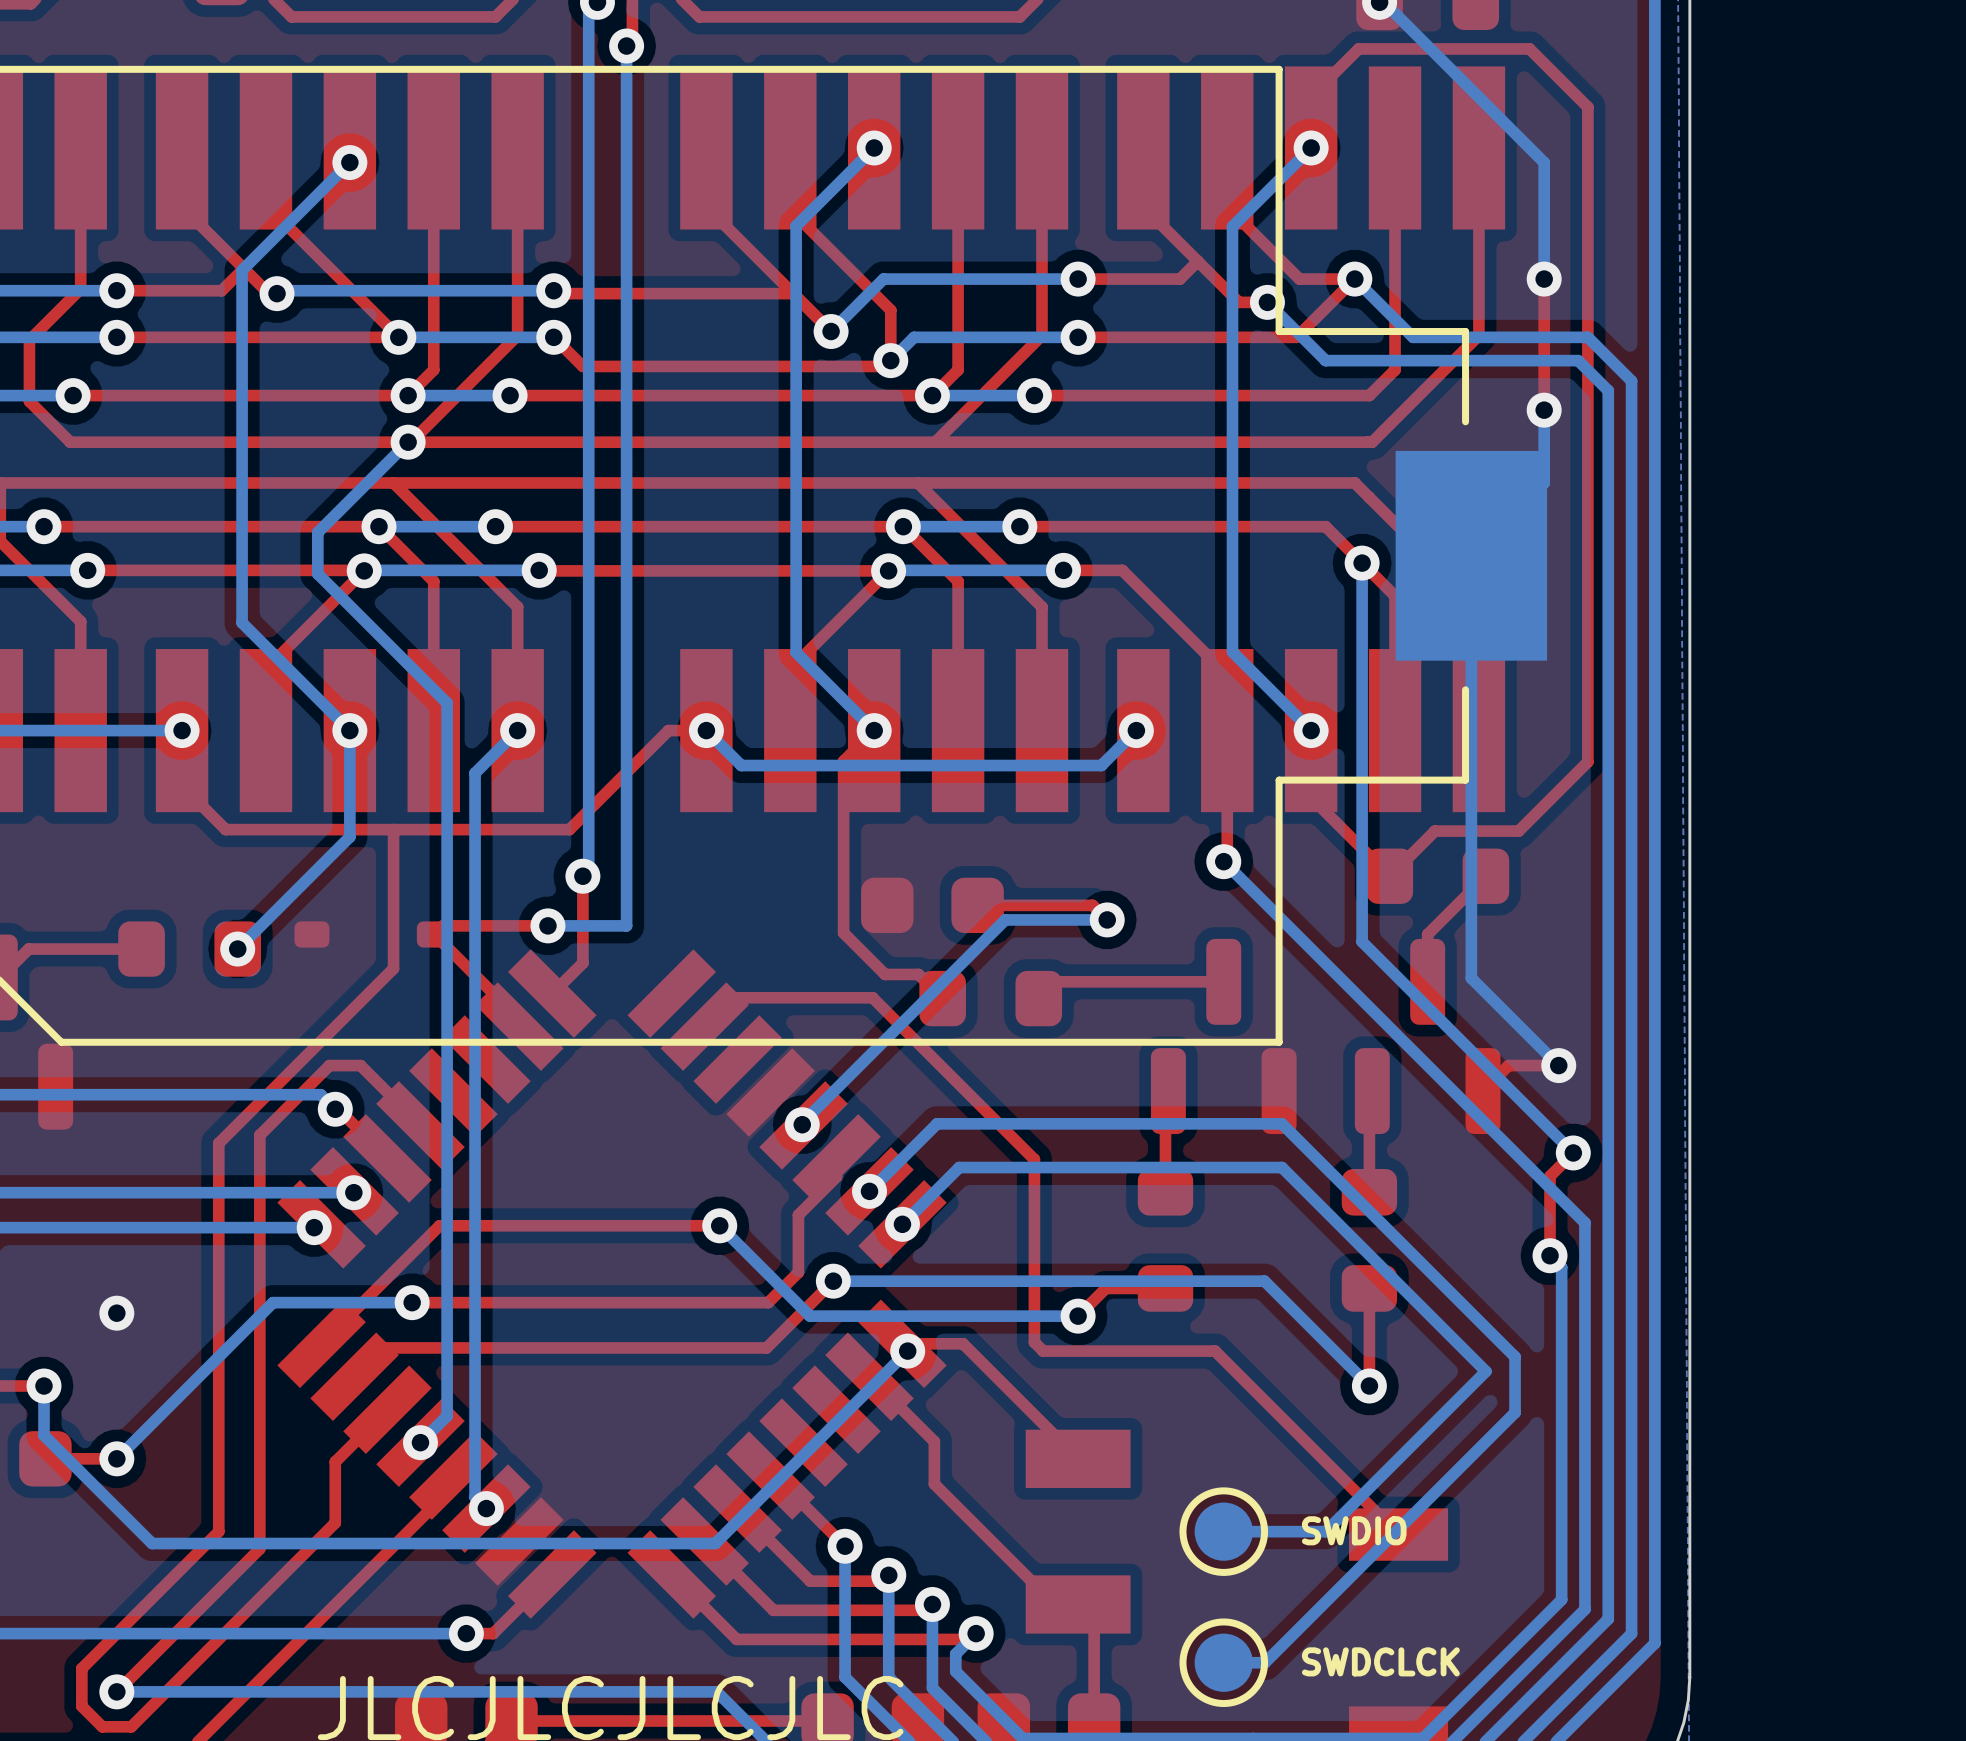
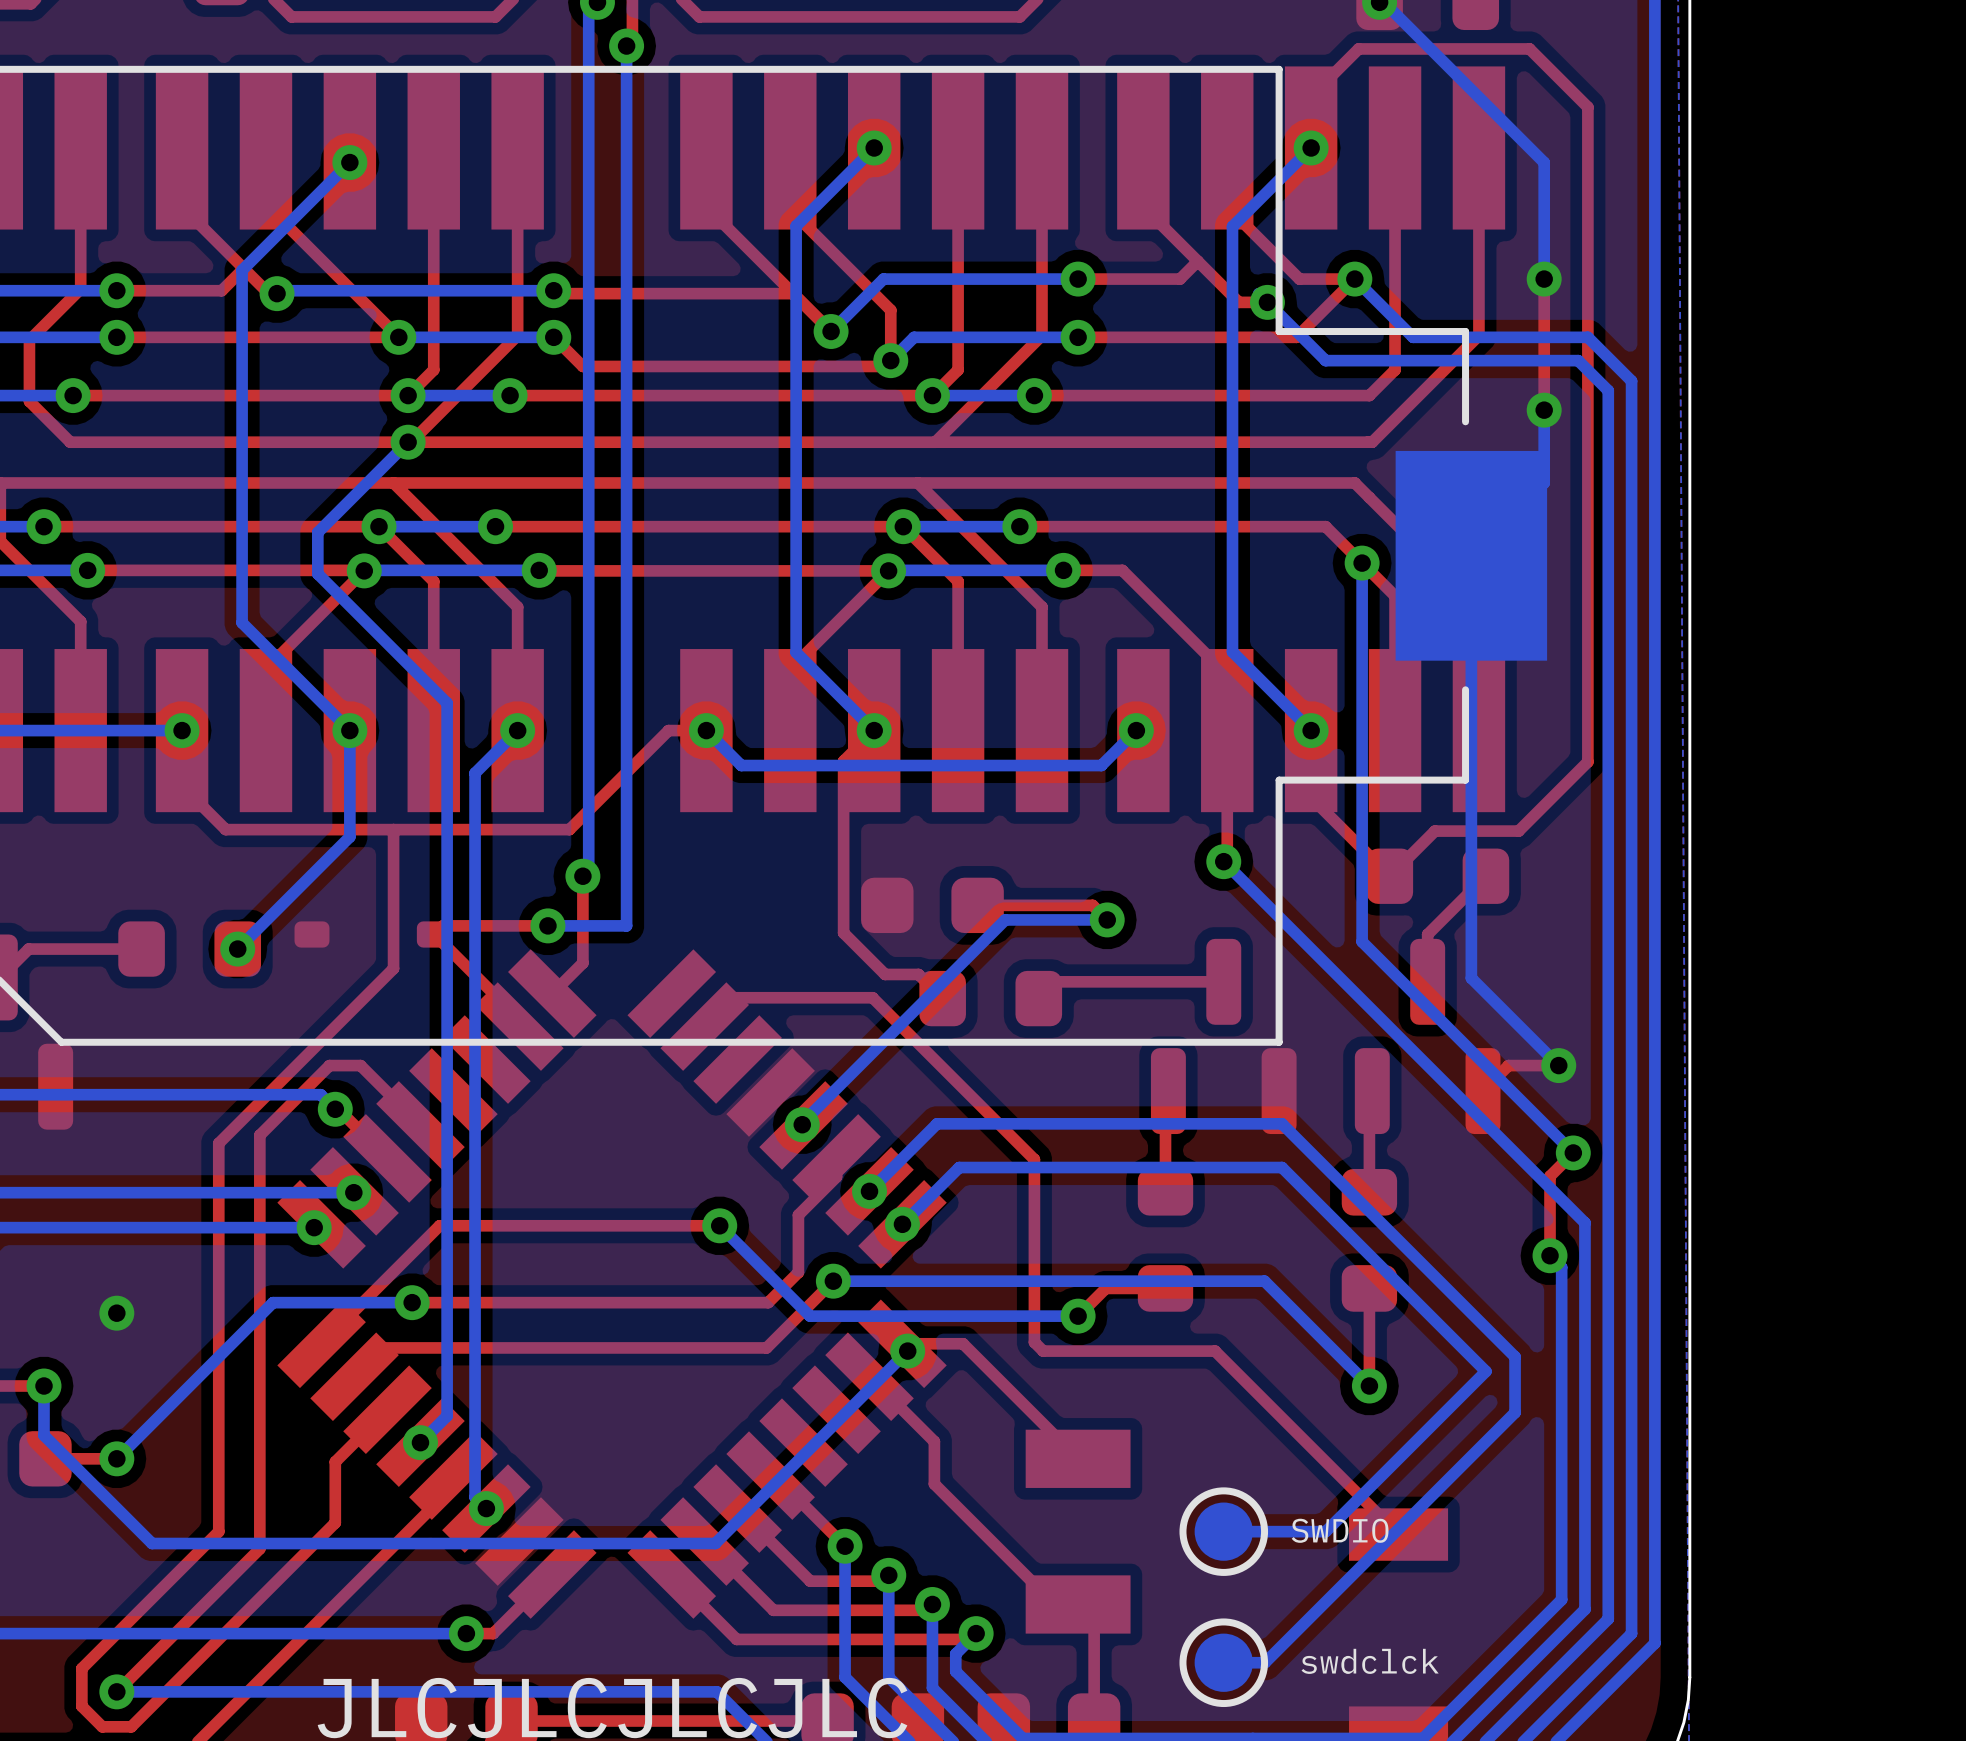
SWDIO name: none -> SWDIO (1340, 1530)
text: SWDIO (1354, 1530) -> none
swdclck name: none -> swdclck (1370, 1661)
text: SWDCLCK (1380, 1661) -> none

